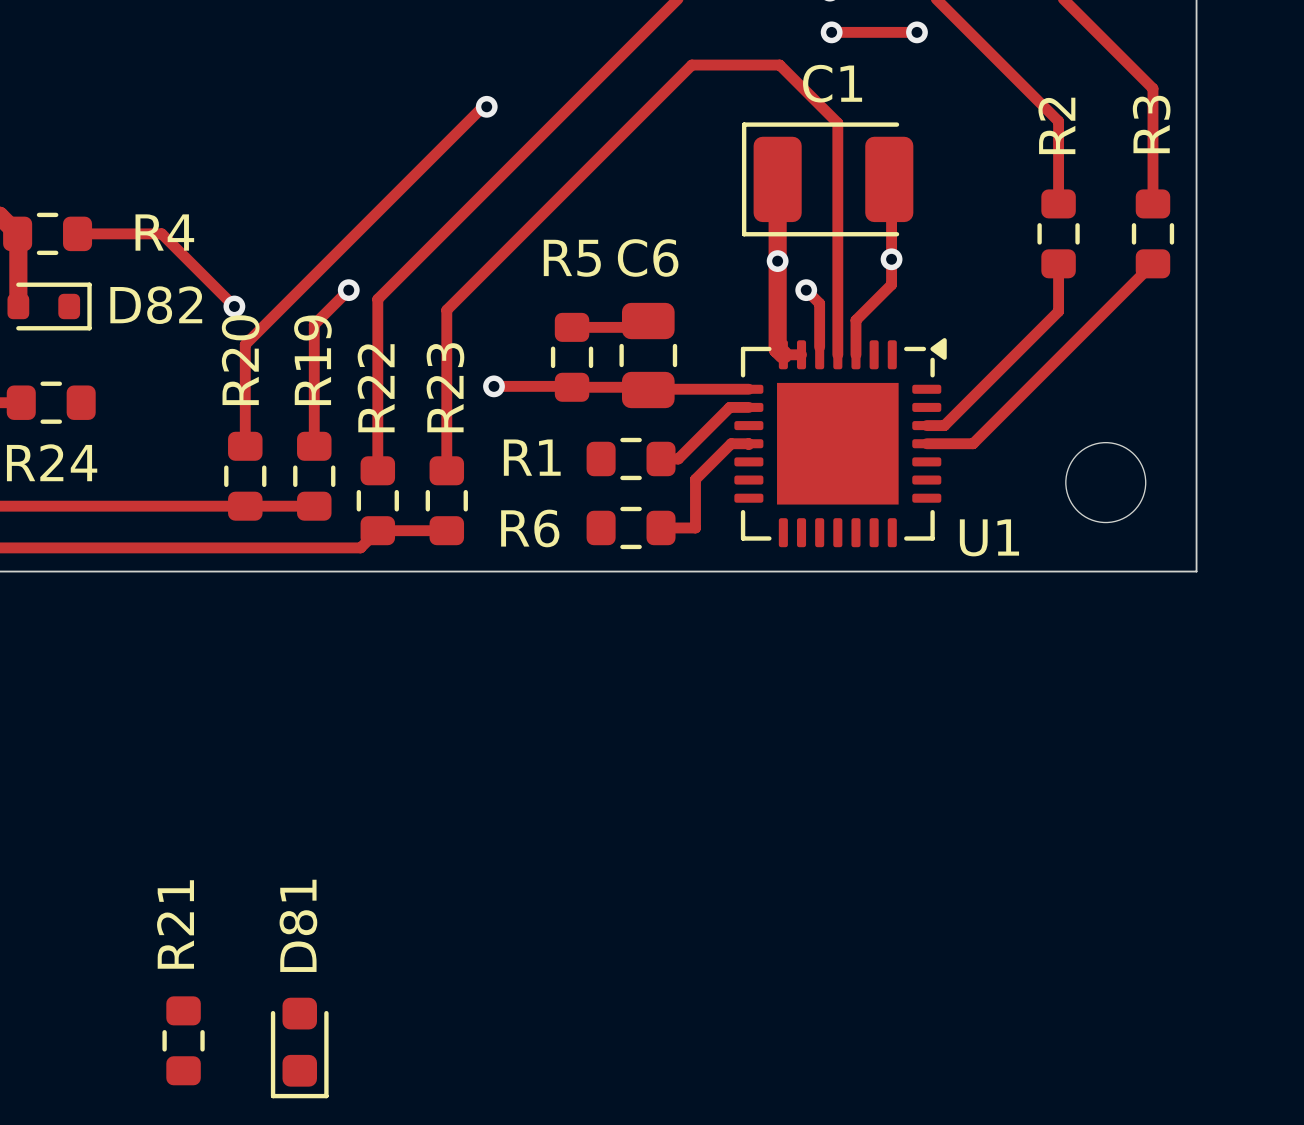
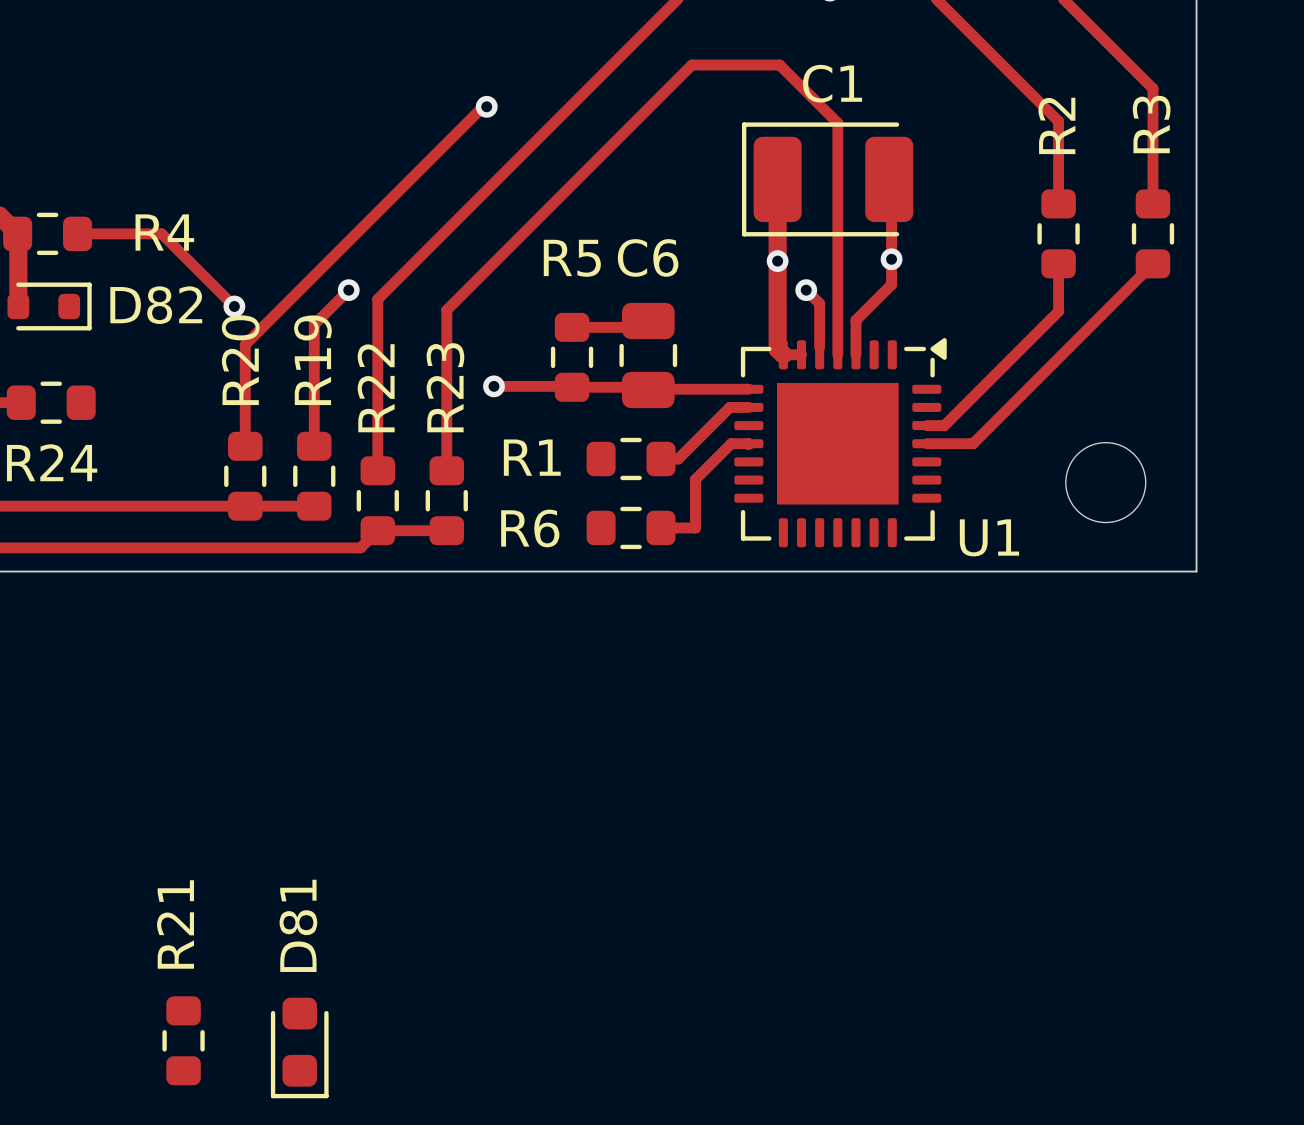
track: (831, 32) (916, 32) -> none
via: (831, 32) -> none
via: (916, 32) -> none

